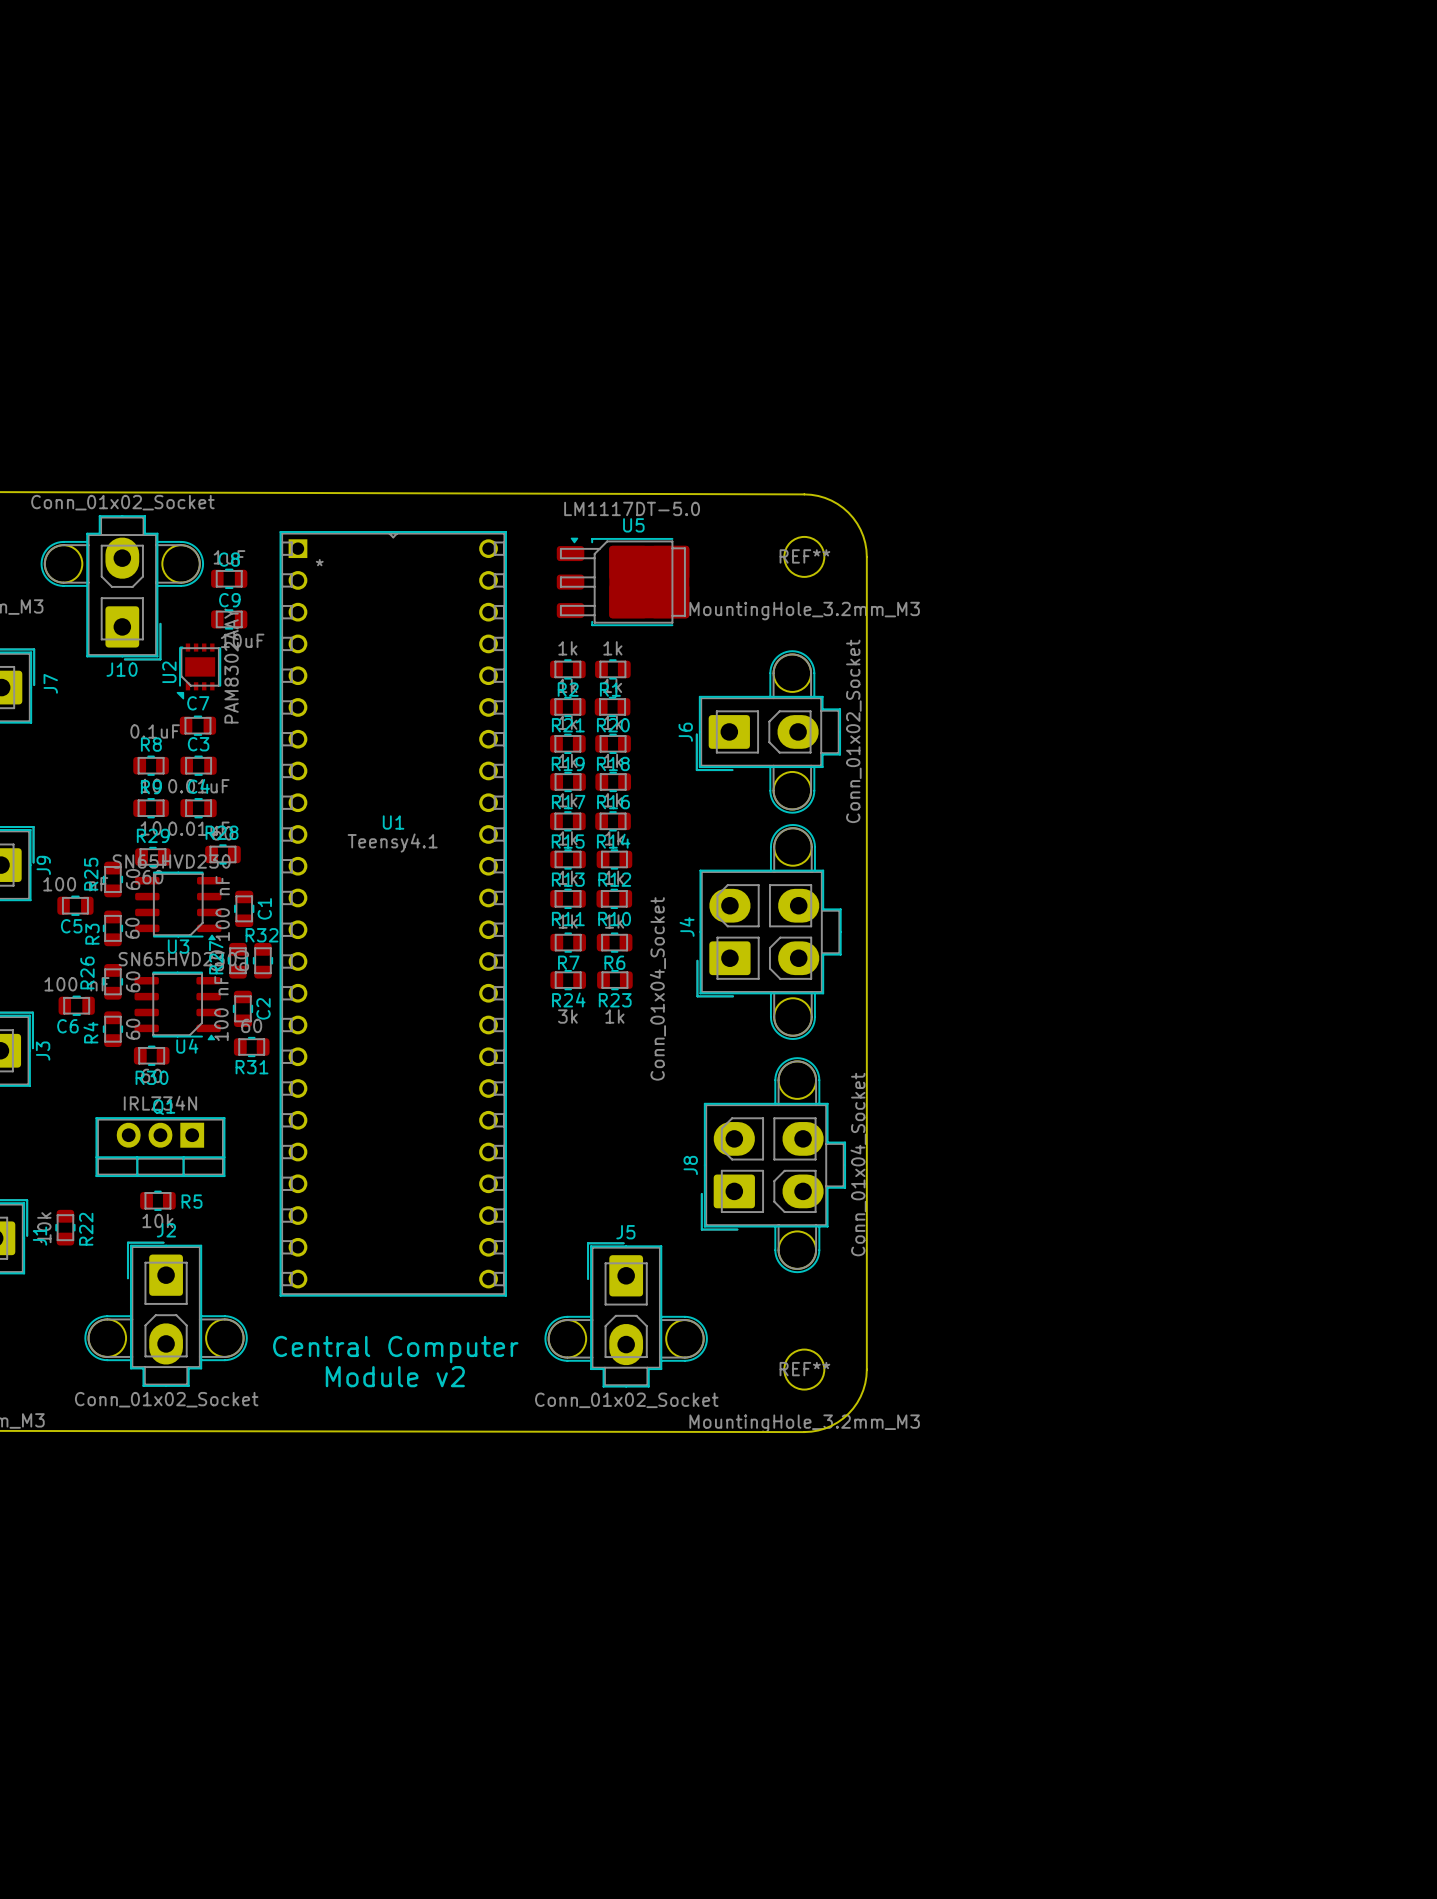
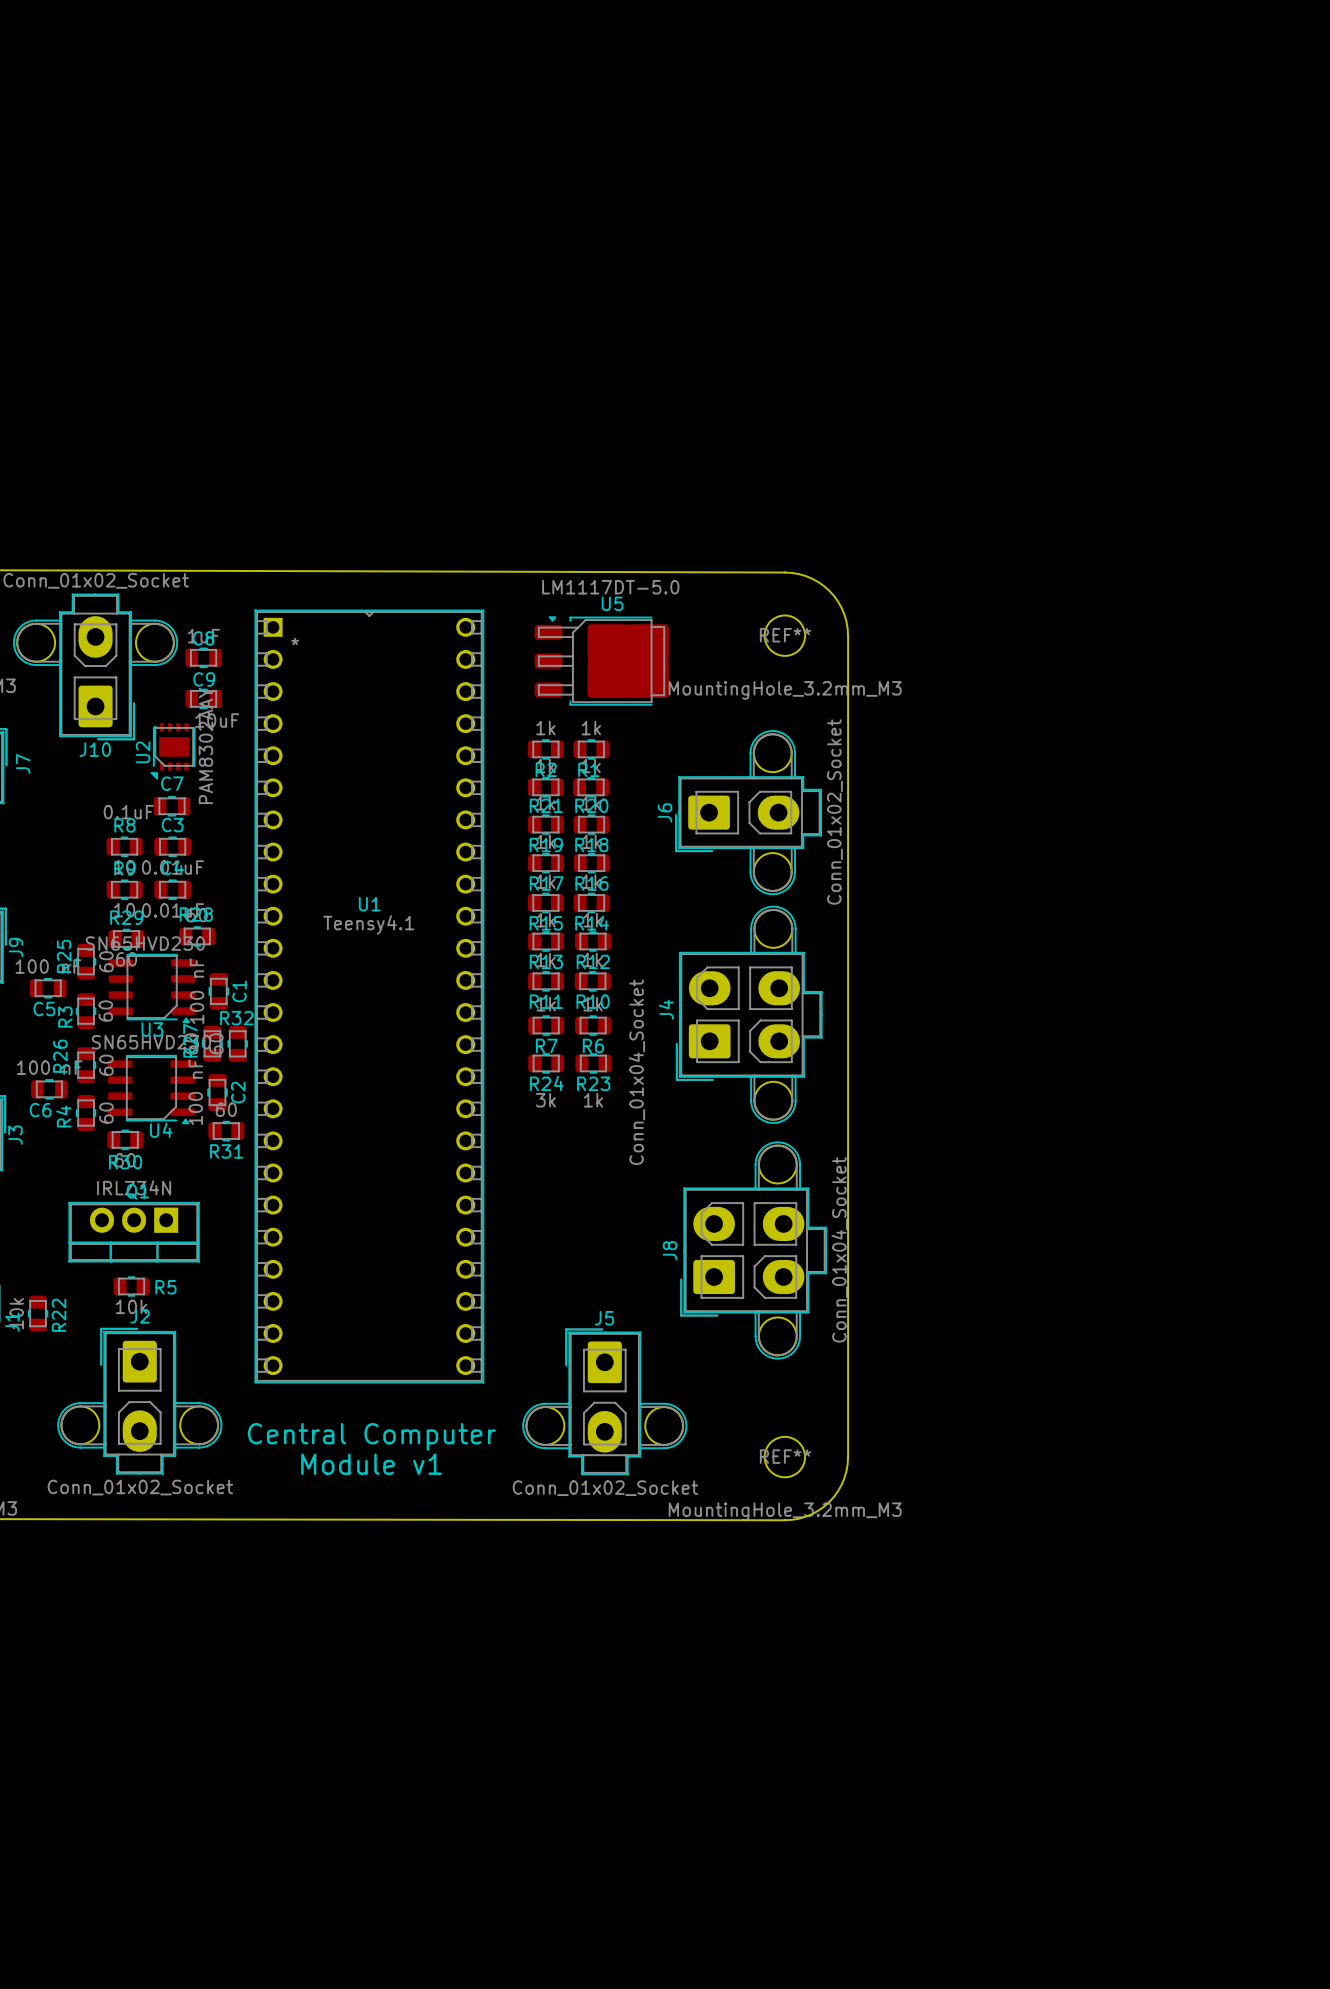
text: Module v2 (395, 1376) -> Module v1 (371, 1464)

